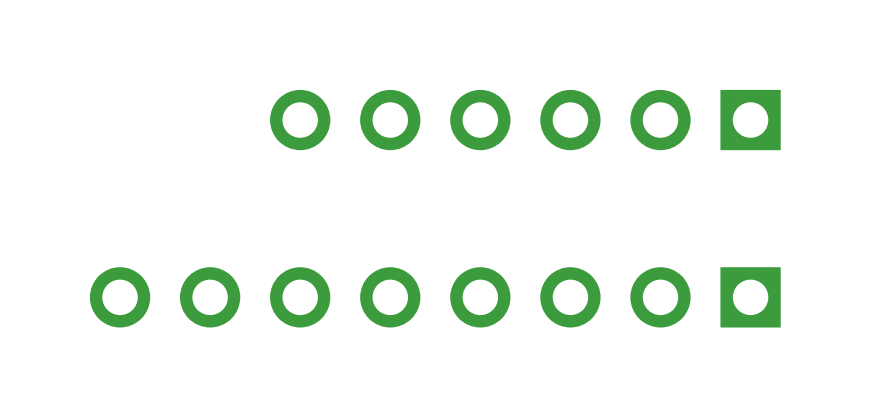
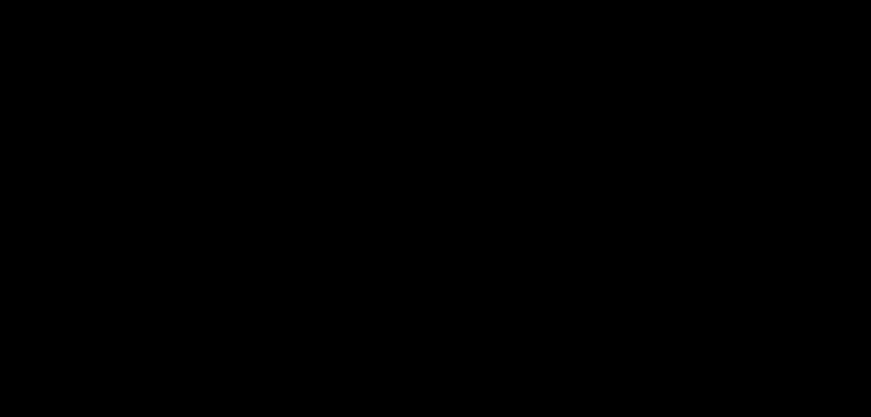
part: (525, 120) -> none
part: (435, 297) -> none

